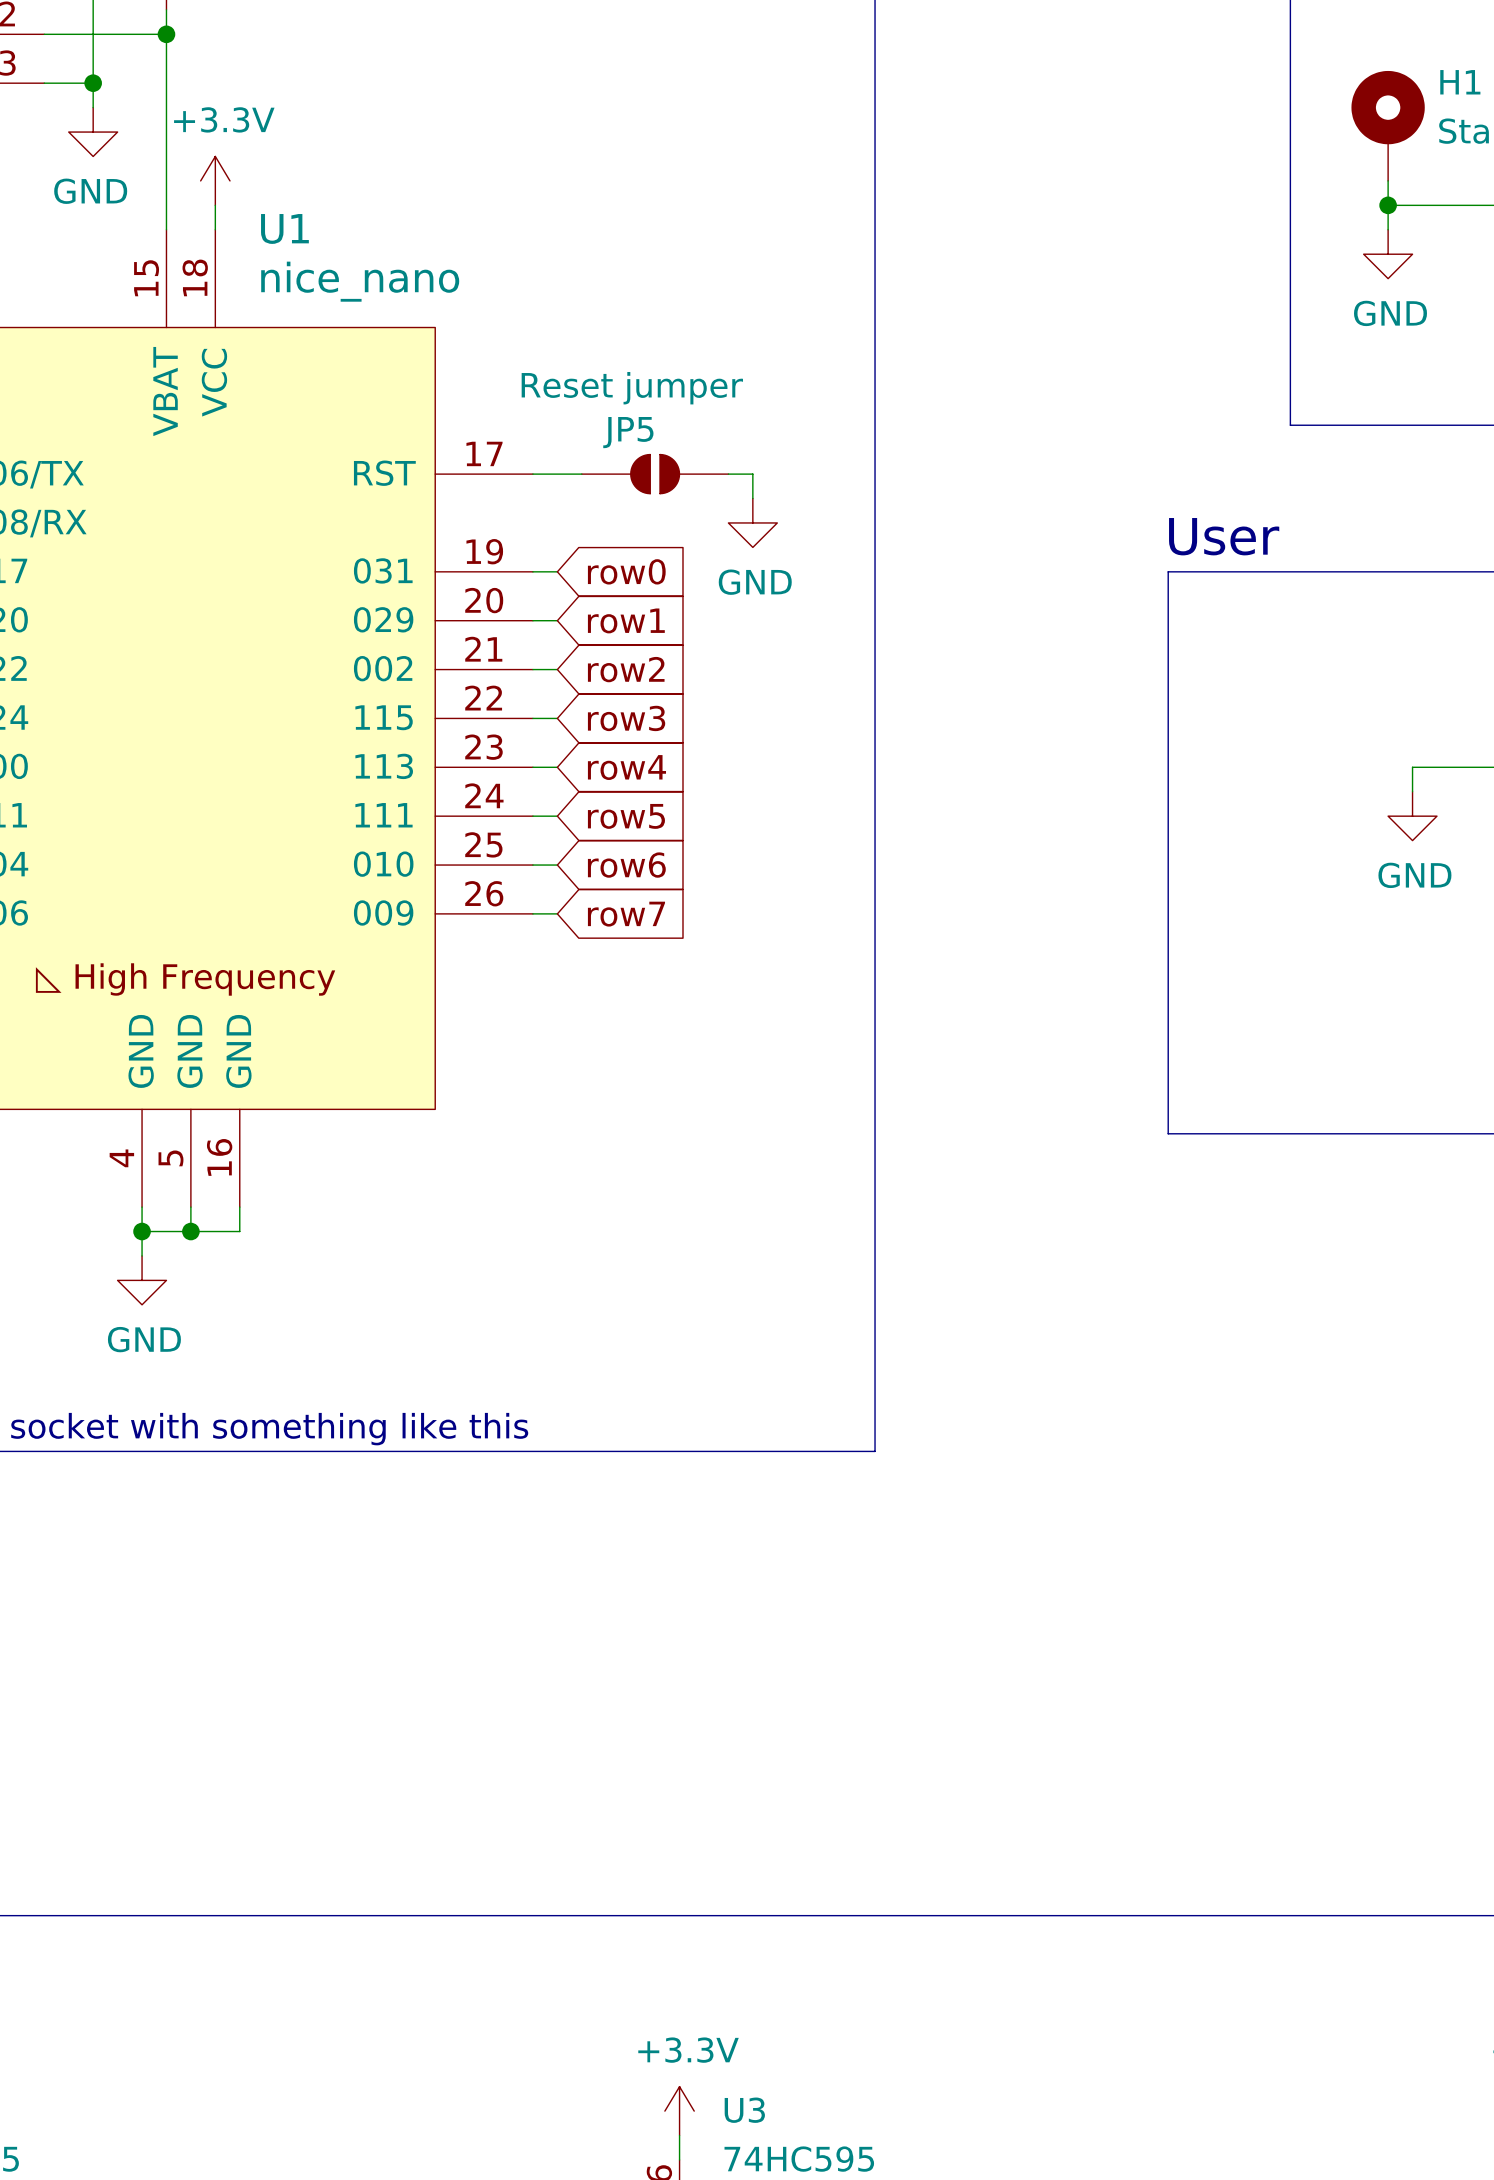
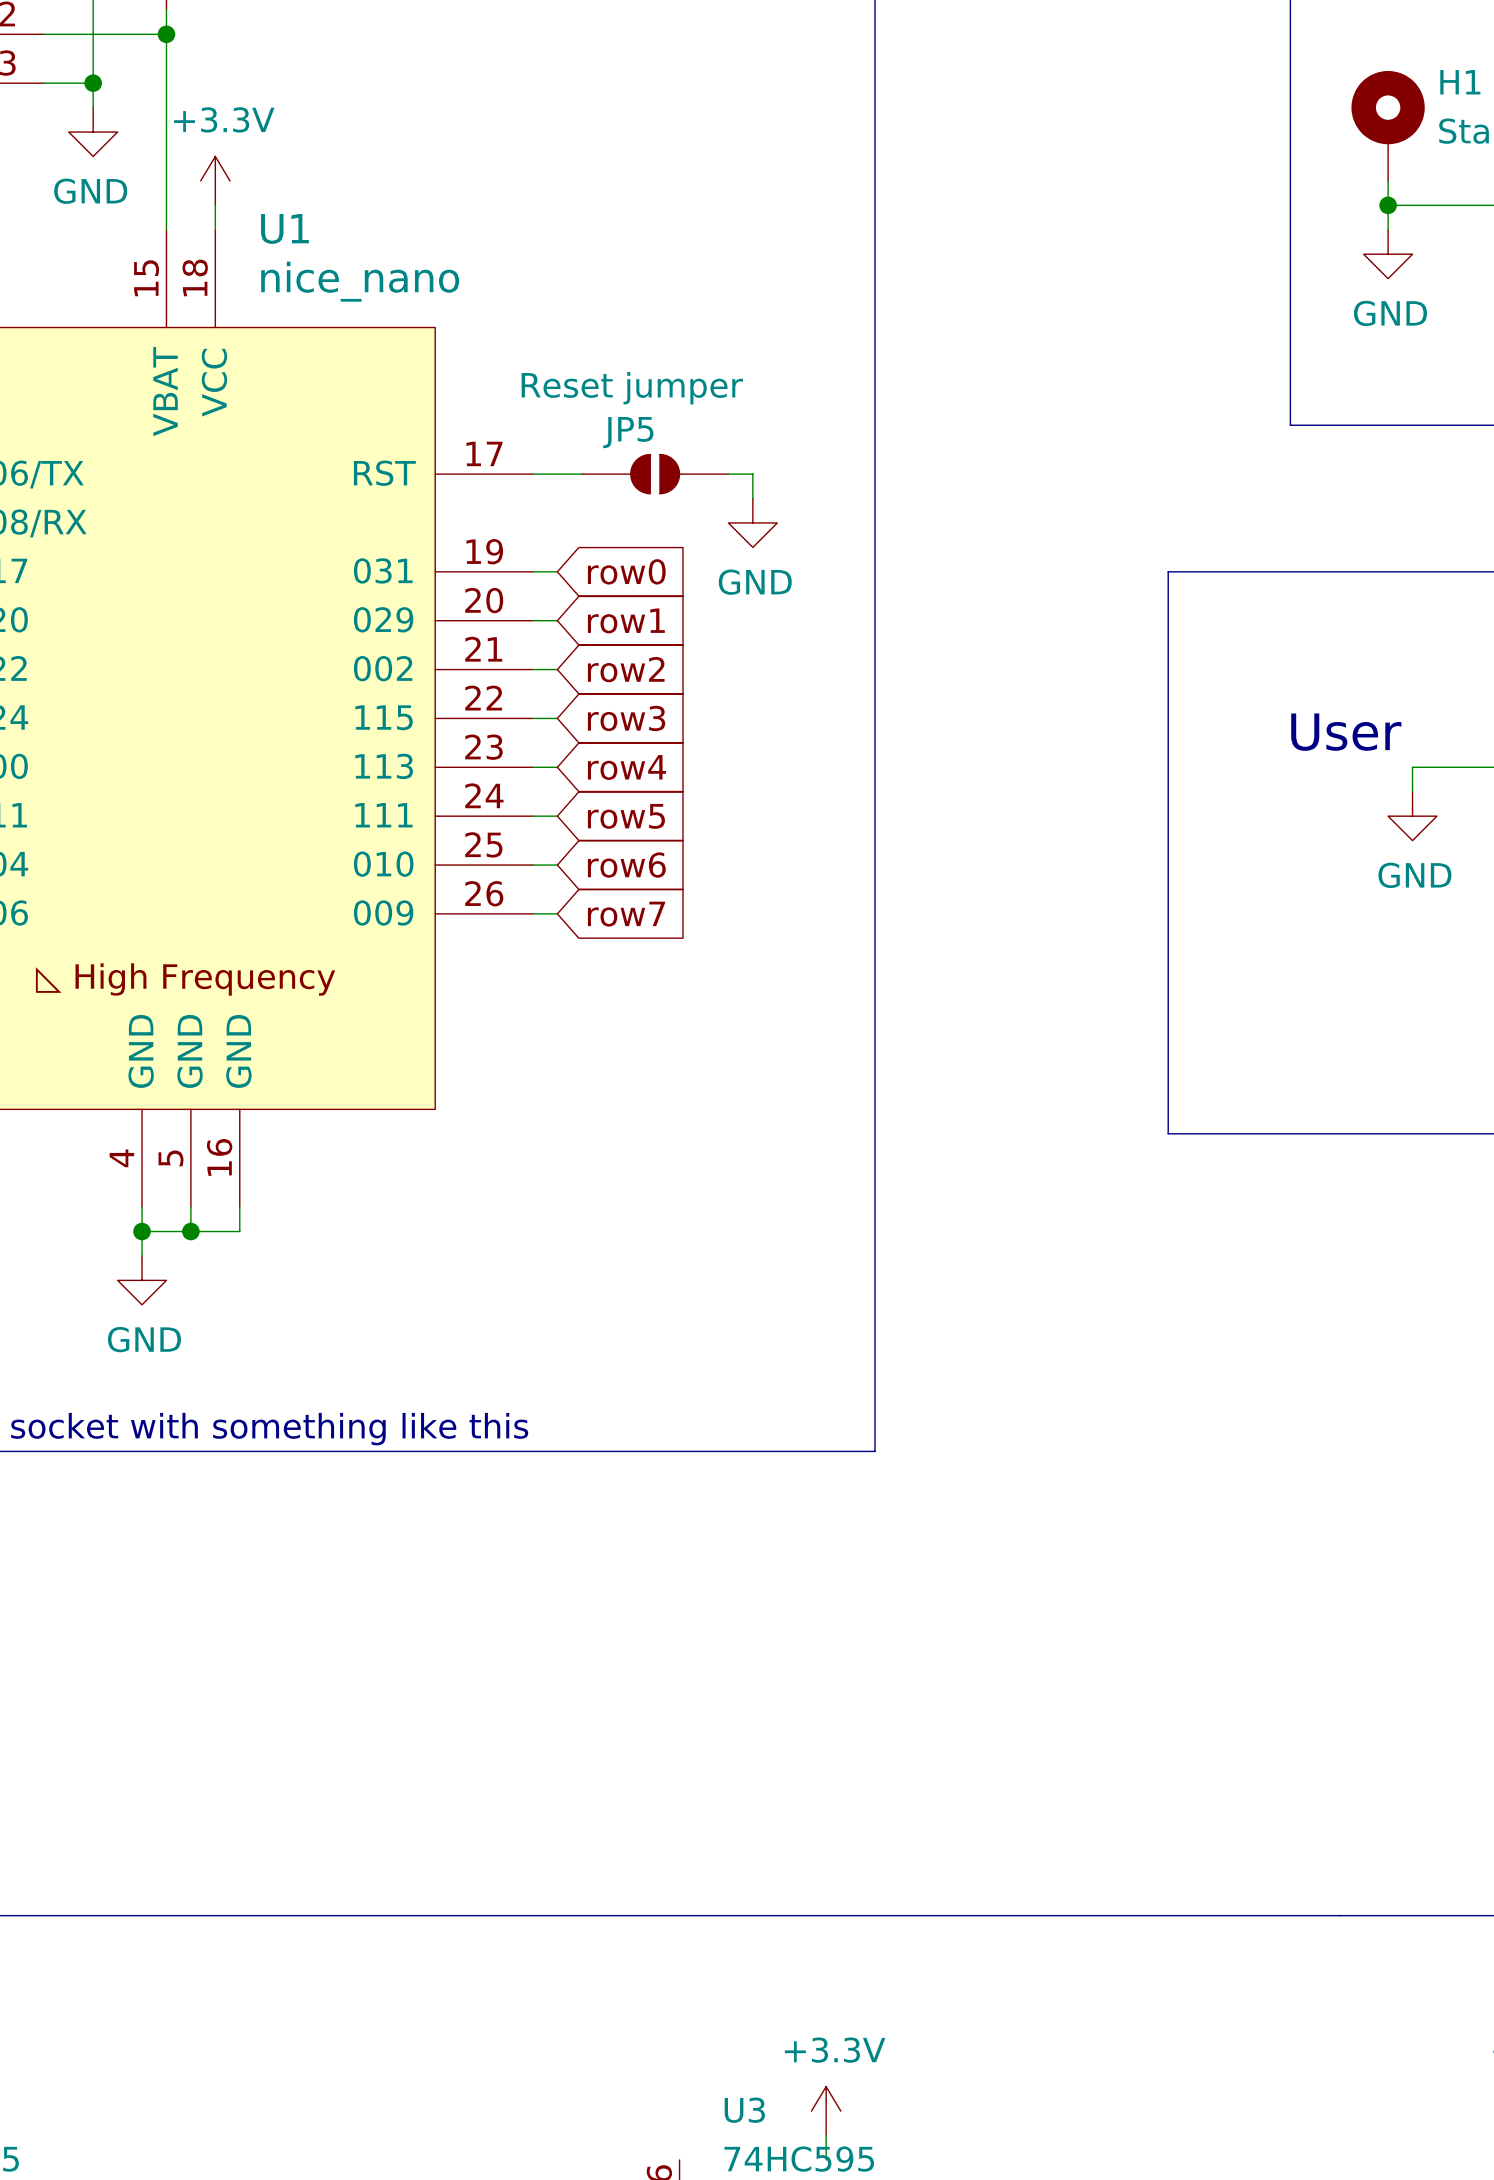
text position: User (1224, 536) -> User (1346, 732)
power symbol position: +3.3V (679, 2111) -> +3.3V (826, 2111)
wire: (679, 2135) (679, 2159) -> (826, 2135) (826, 2159)

